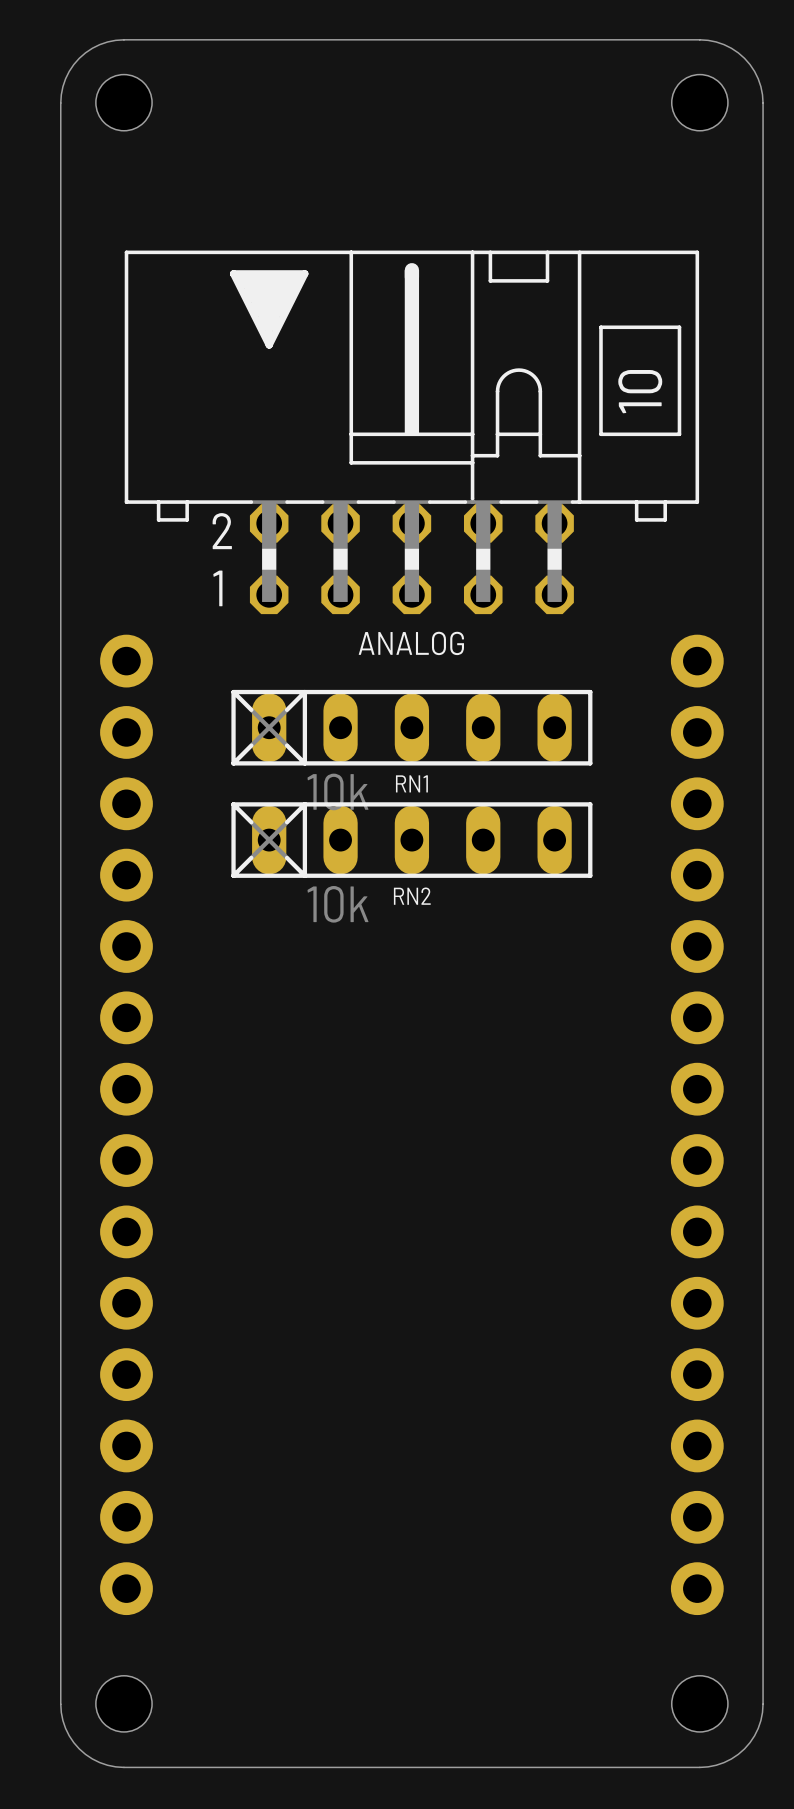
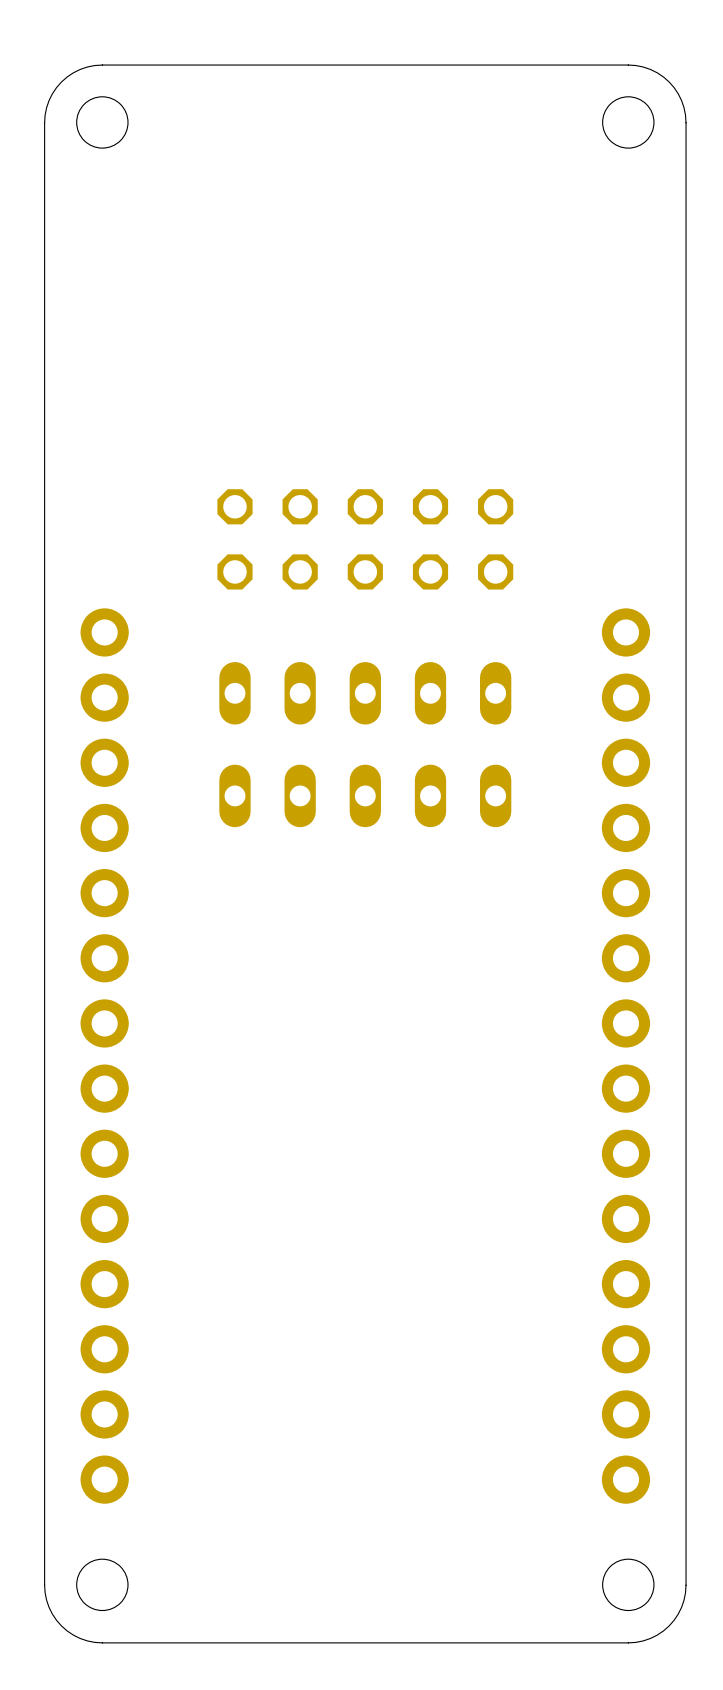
ANALOG side: bottom (411, 432) -> top (365, 539)
RN1 side: bottom (411, 727) -> top (365, 693)
RN2 side: bottom (411, 840) -> top (365, 795)

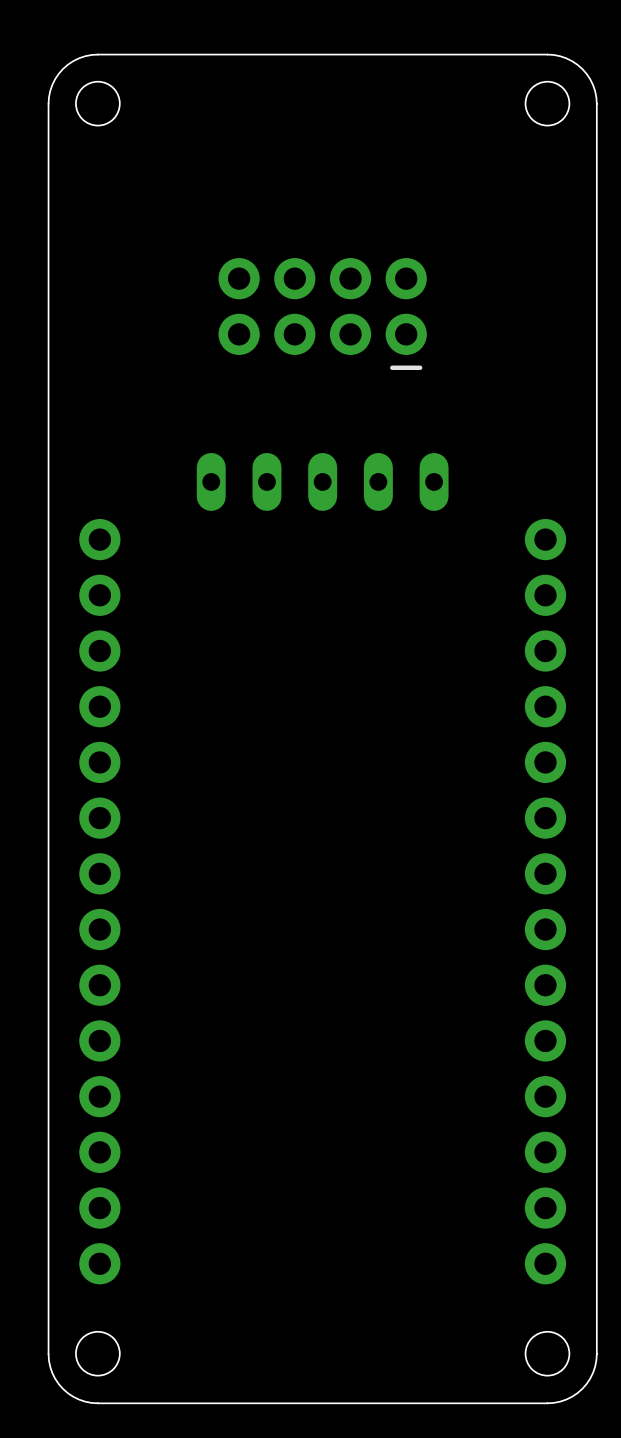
part: none -> (322, 314)
part footprint: [217, 489, 514, 590] -> [196, 452, 449, 511]
part: (365, 693) -> none
part: (365, 795) -> none

